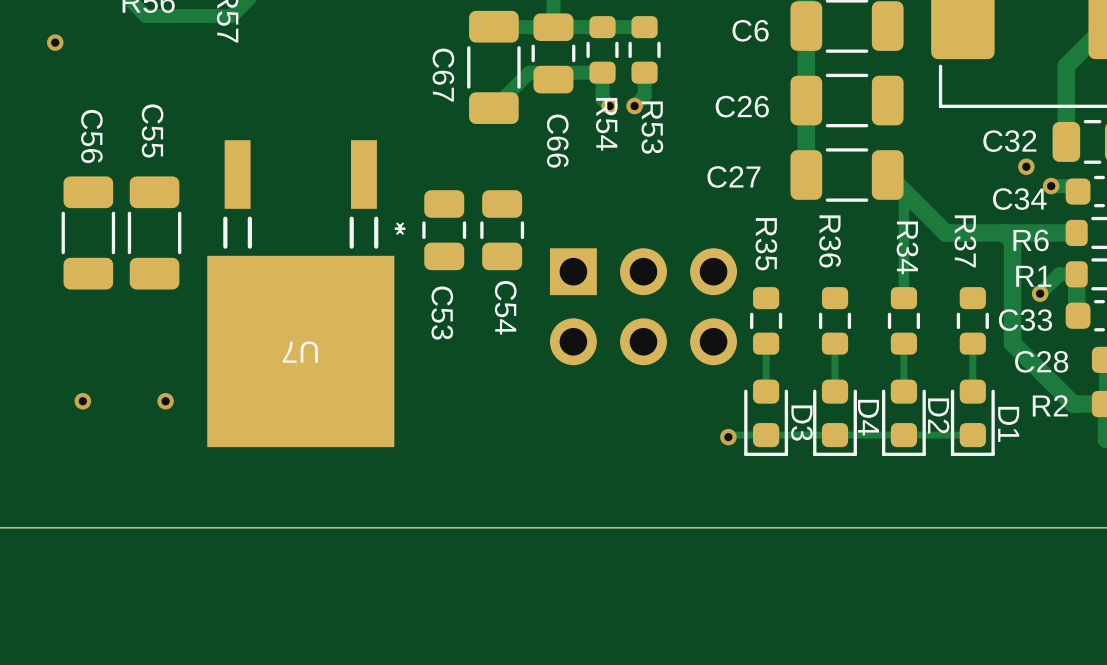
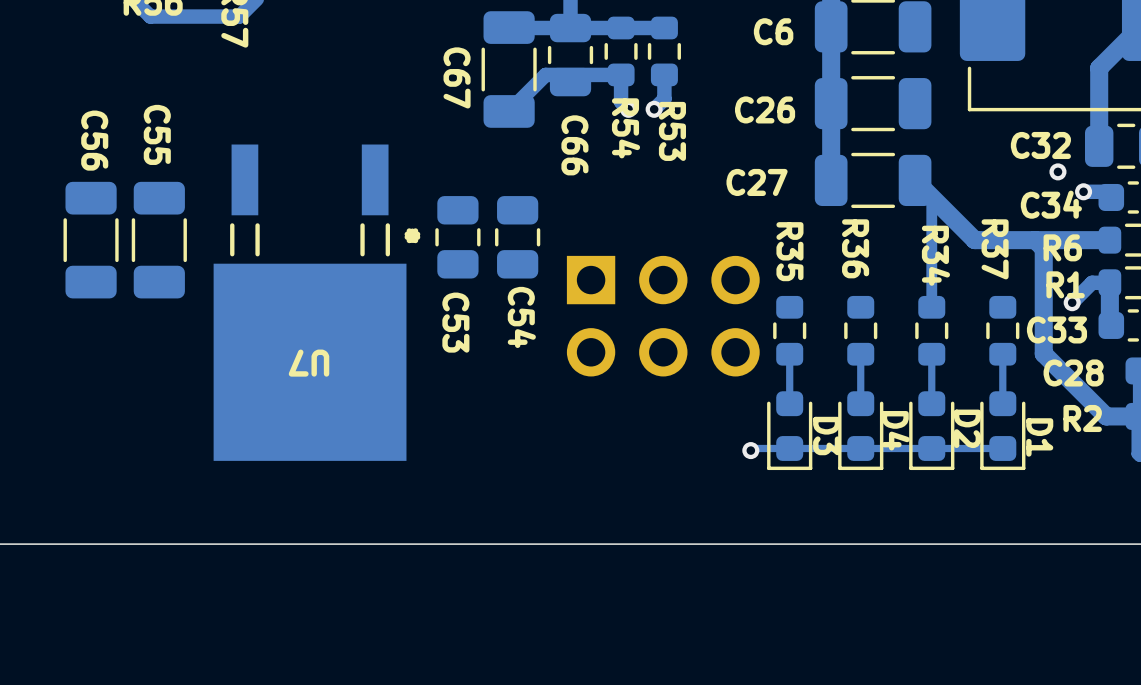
via: (55, 42) -> none
via: (82, 401) -> none
via: (165, 401) -> none

